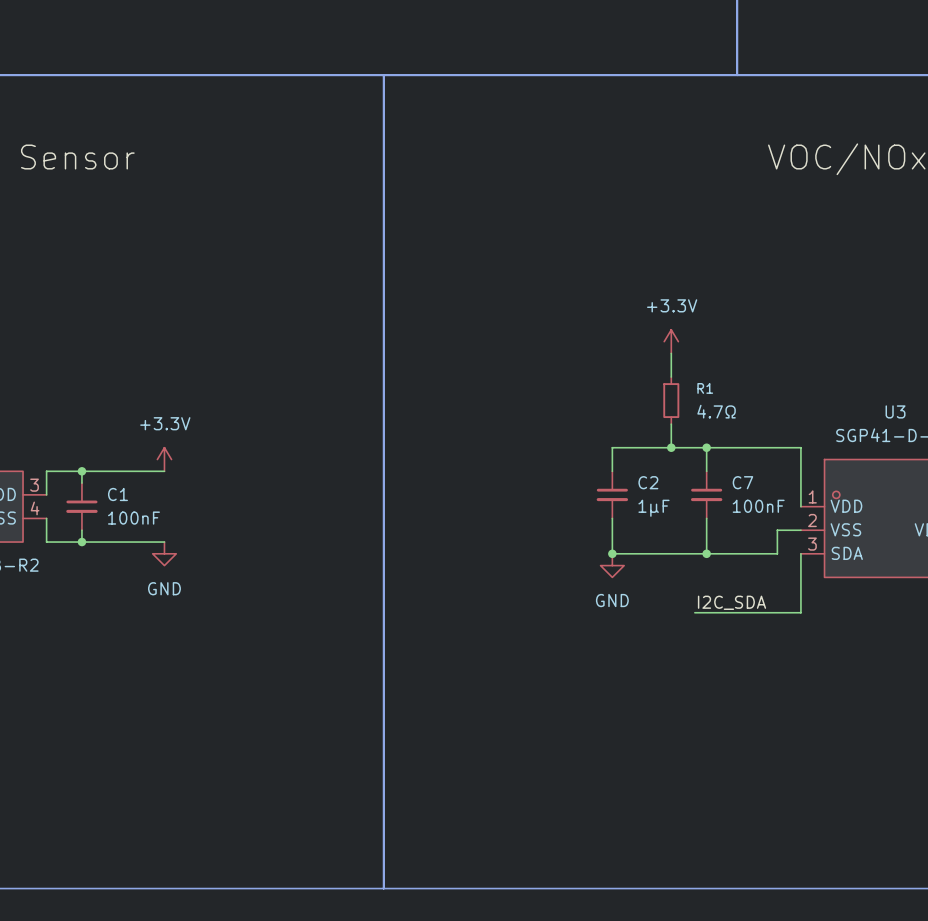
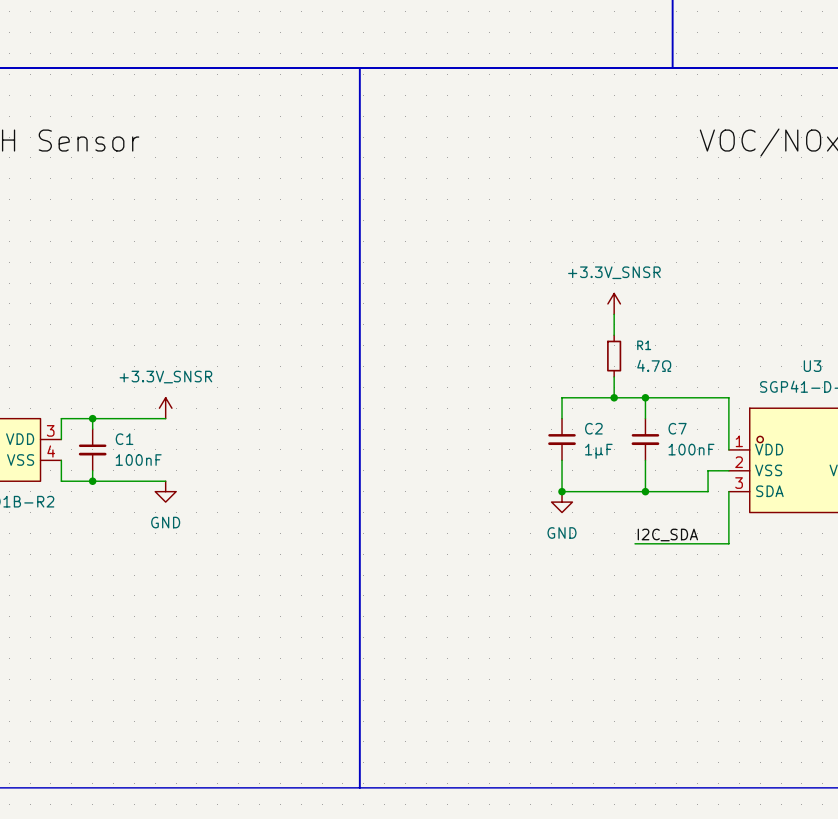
power symbol: +3.3V (671, 341) -> +3.3V_SNSR (614, 303)
power symbol: +3.3V (164, 459) -> +3.3V_SNSR (165, 408)

